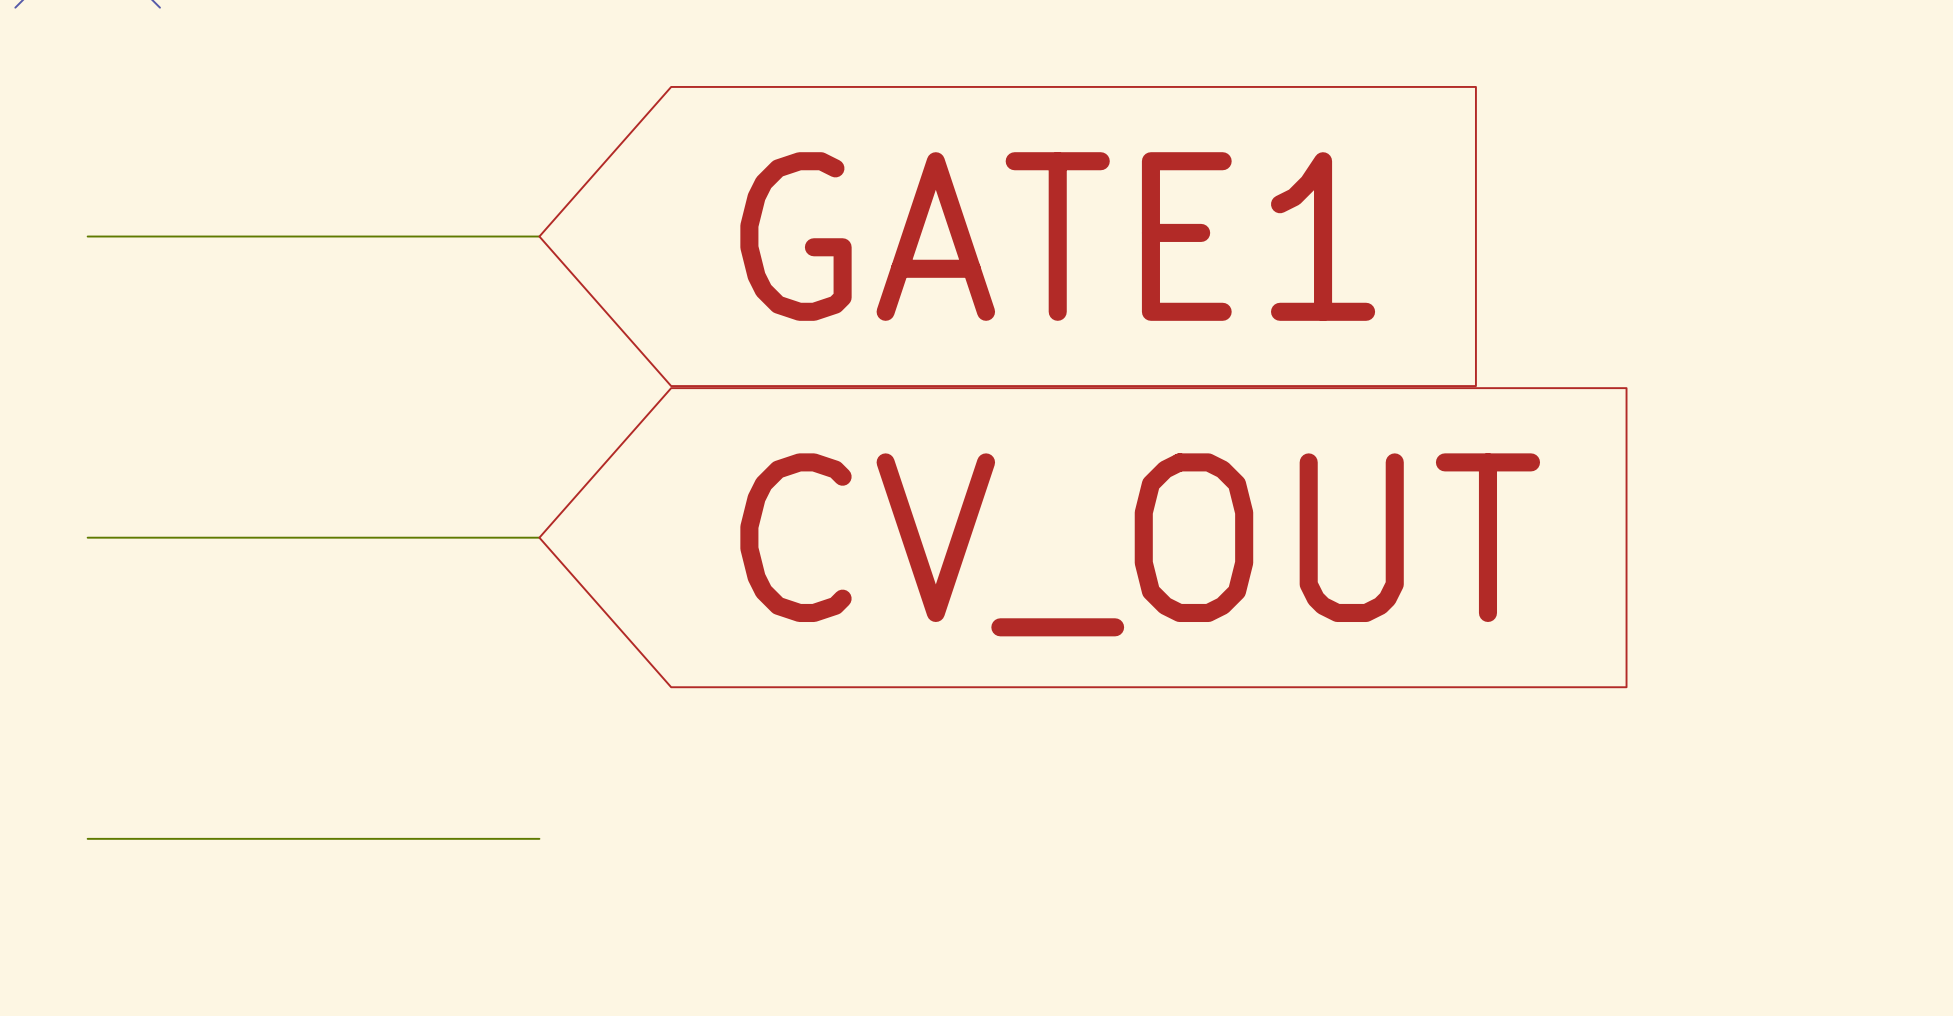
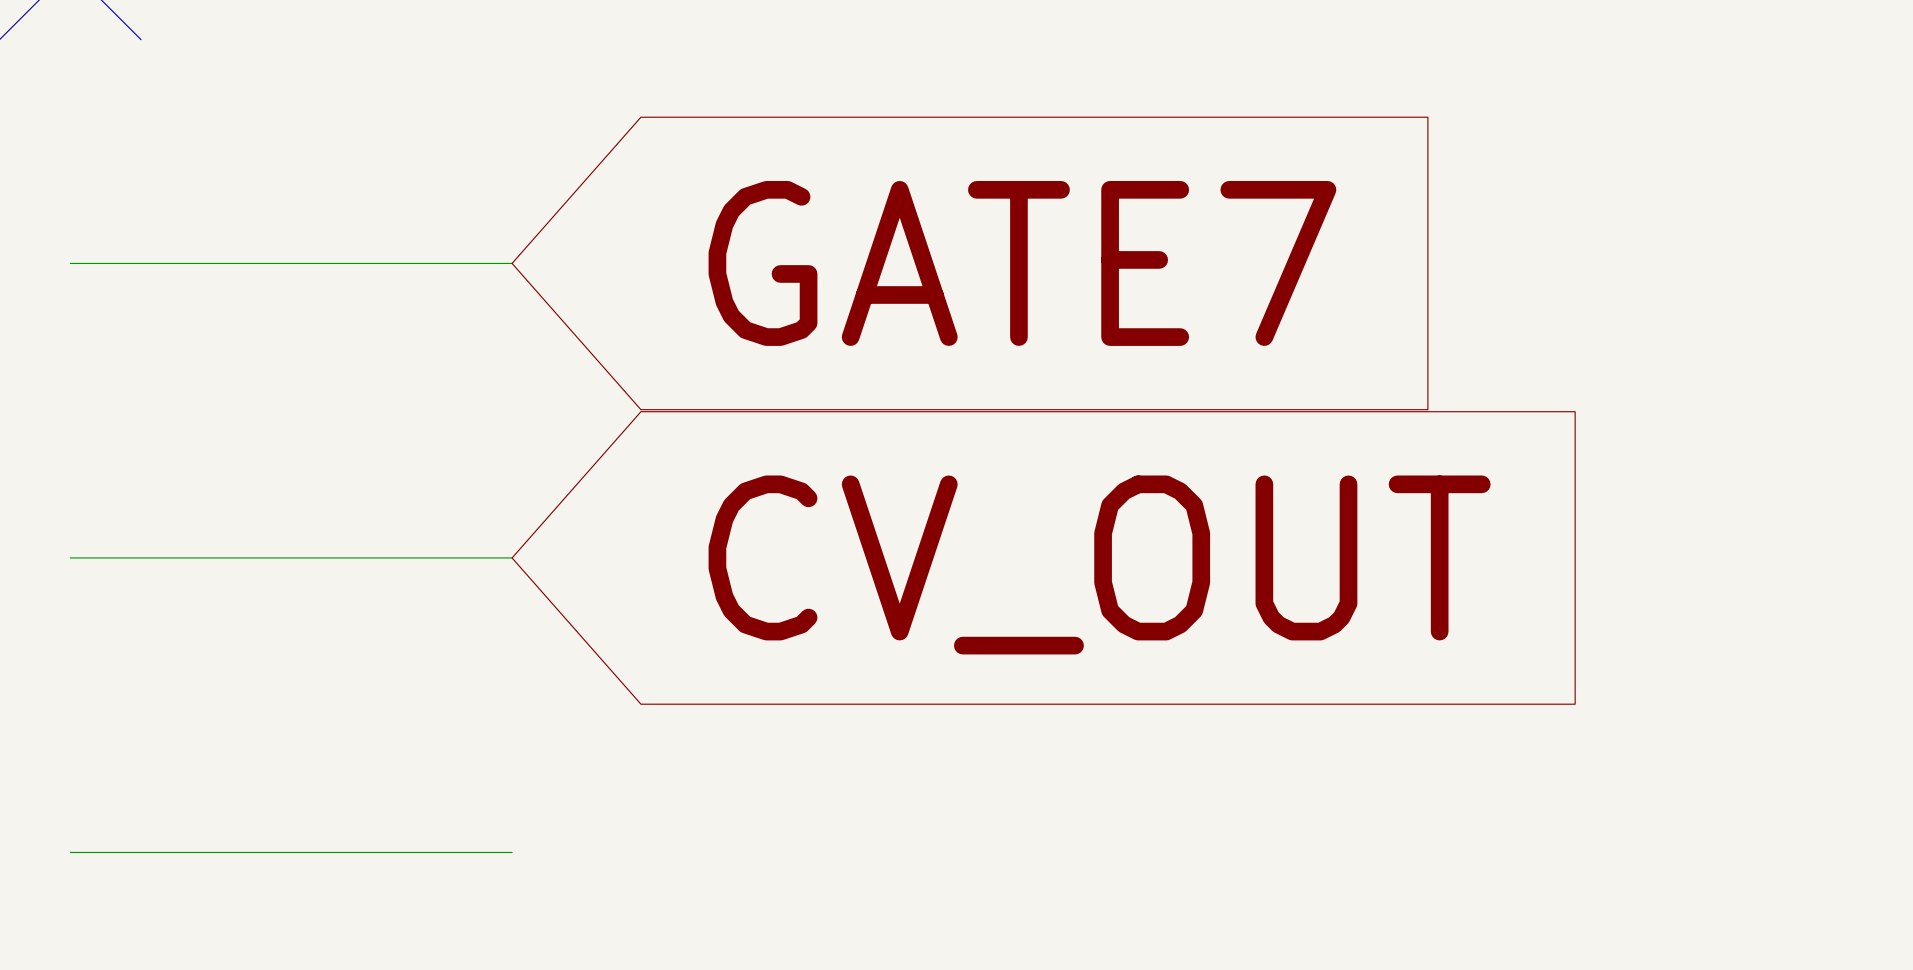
global label: GATE1 (1057, 236) -> GATE7 (1022, 263)

